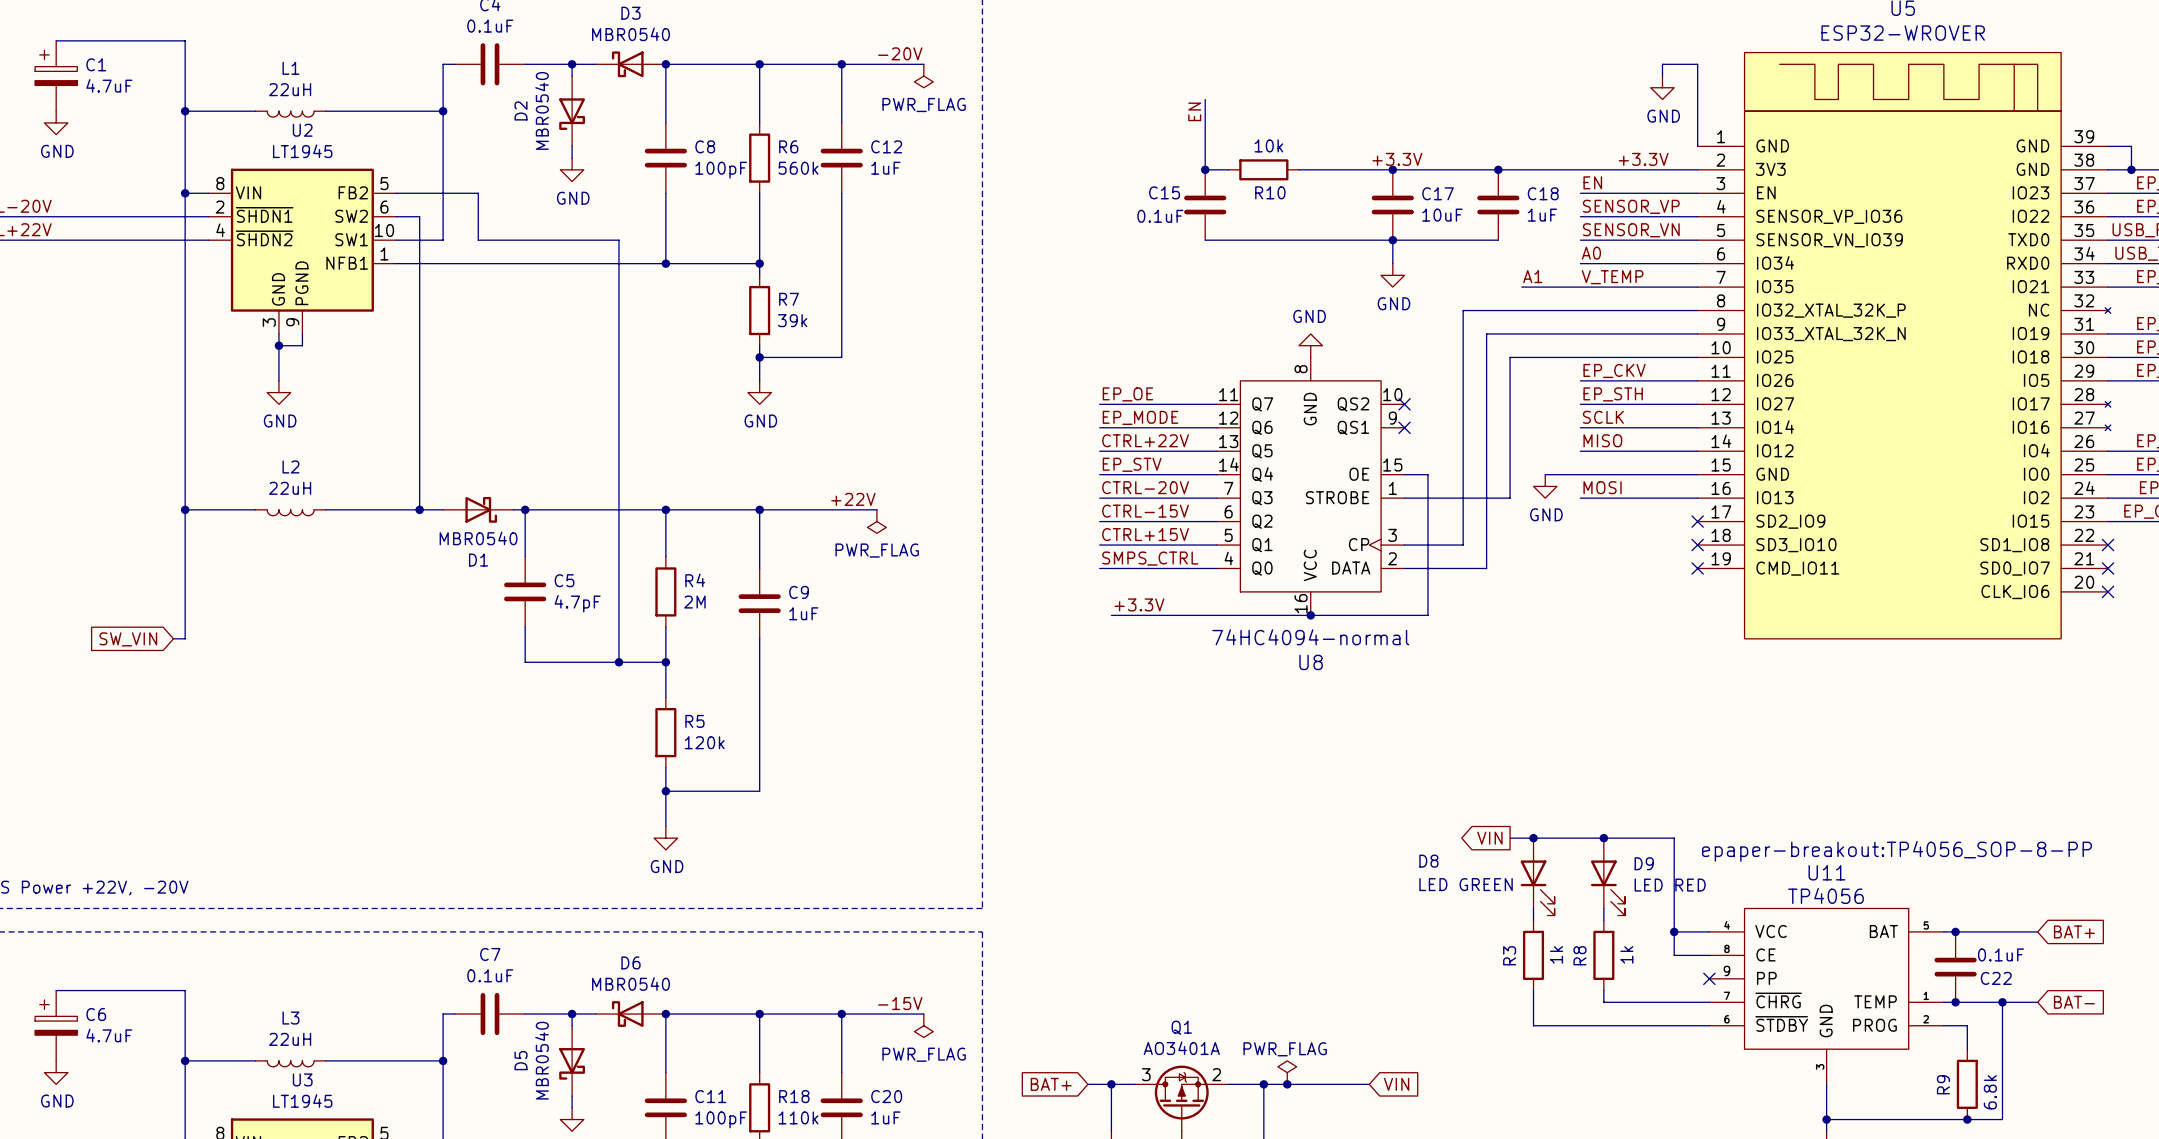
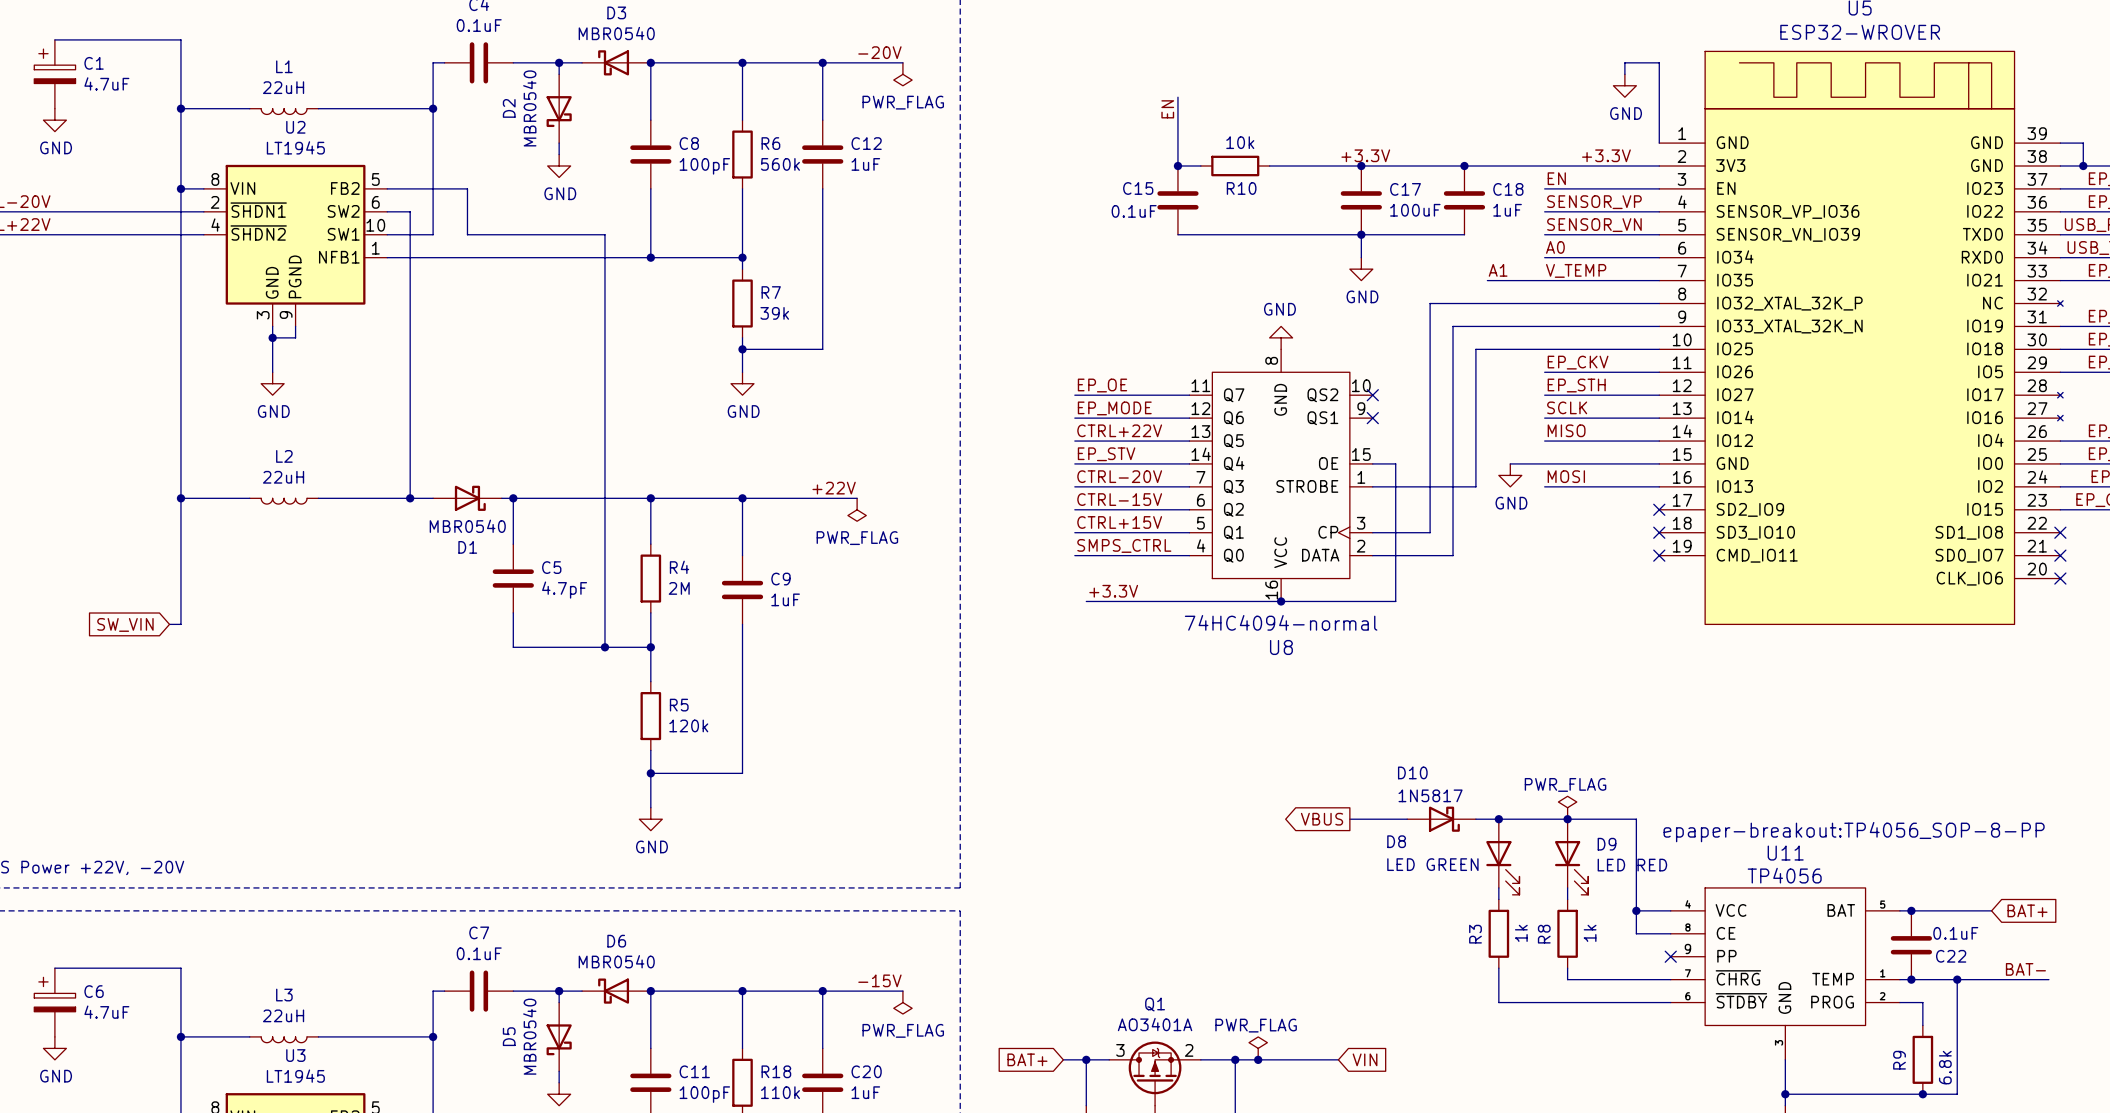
C17 value: 10uF (1442, 215) -> 100uF (1415, 210)
power symbol: none -> PWR_FLAG (1567, 807)
global label: none -> VBUS (1322, 819)
wire: none -> (1349, 819) (1407, 819)
D10: none -> 1N5817 (1441, 819)
global label: VIN (1489, 838) -> none
label: none -> BAT- (2025, 969)
wire: none -> (1991, 979) (2048, 979)
global label: BAT- (2074, 1002) -> none

